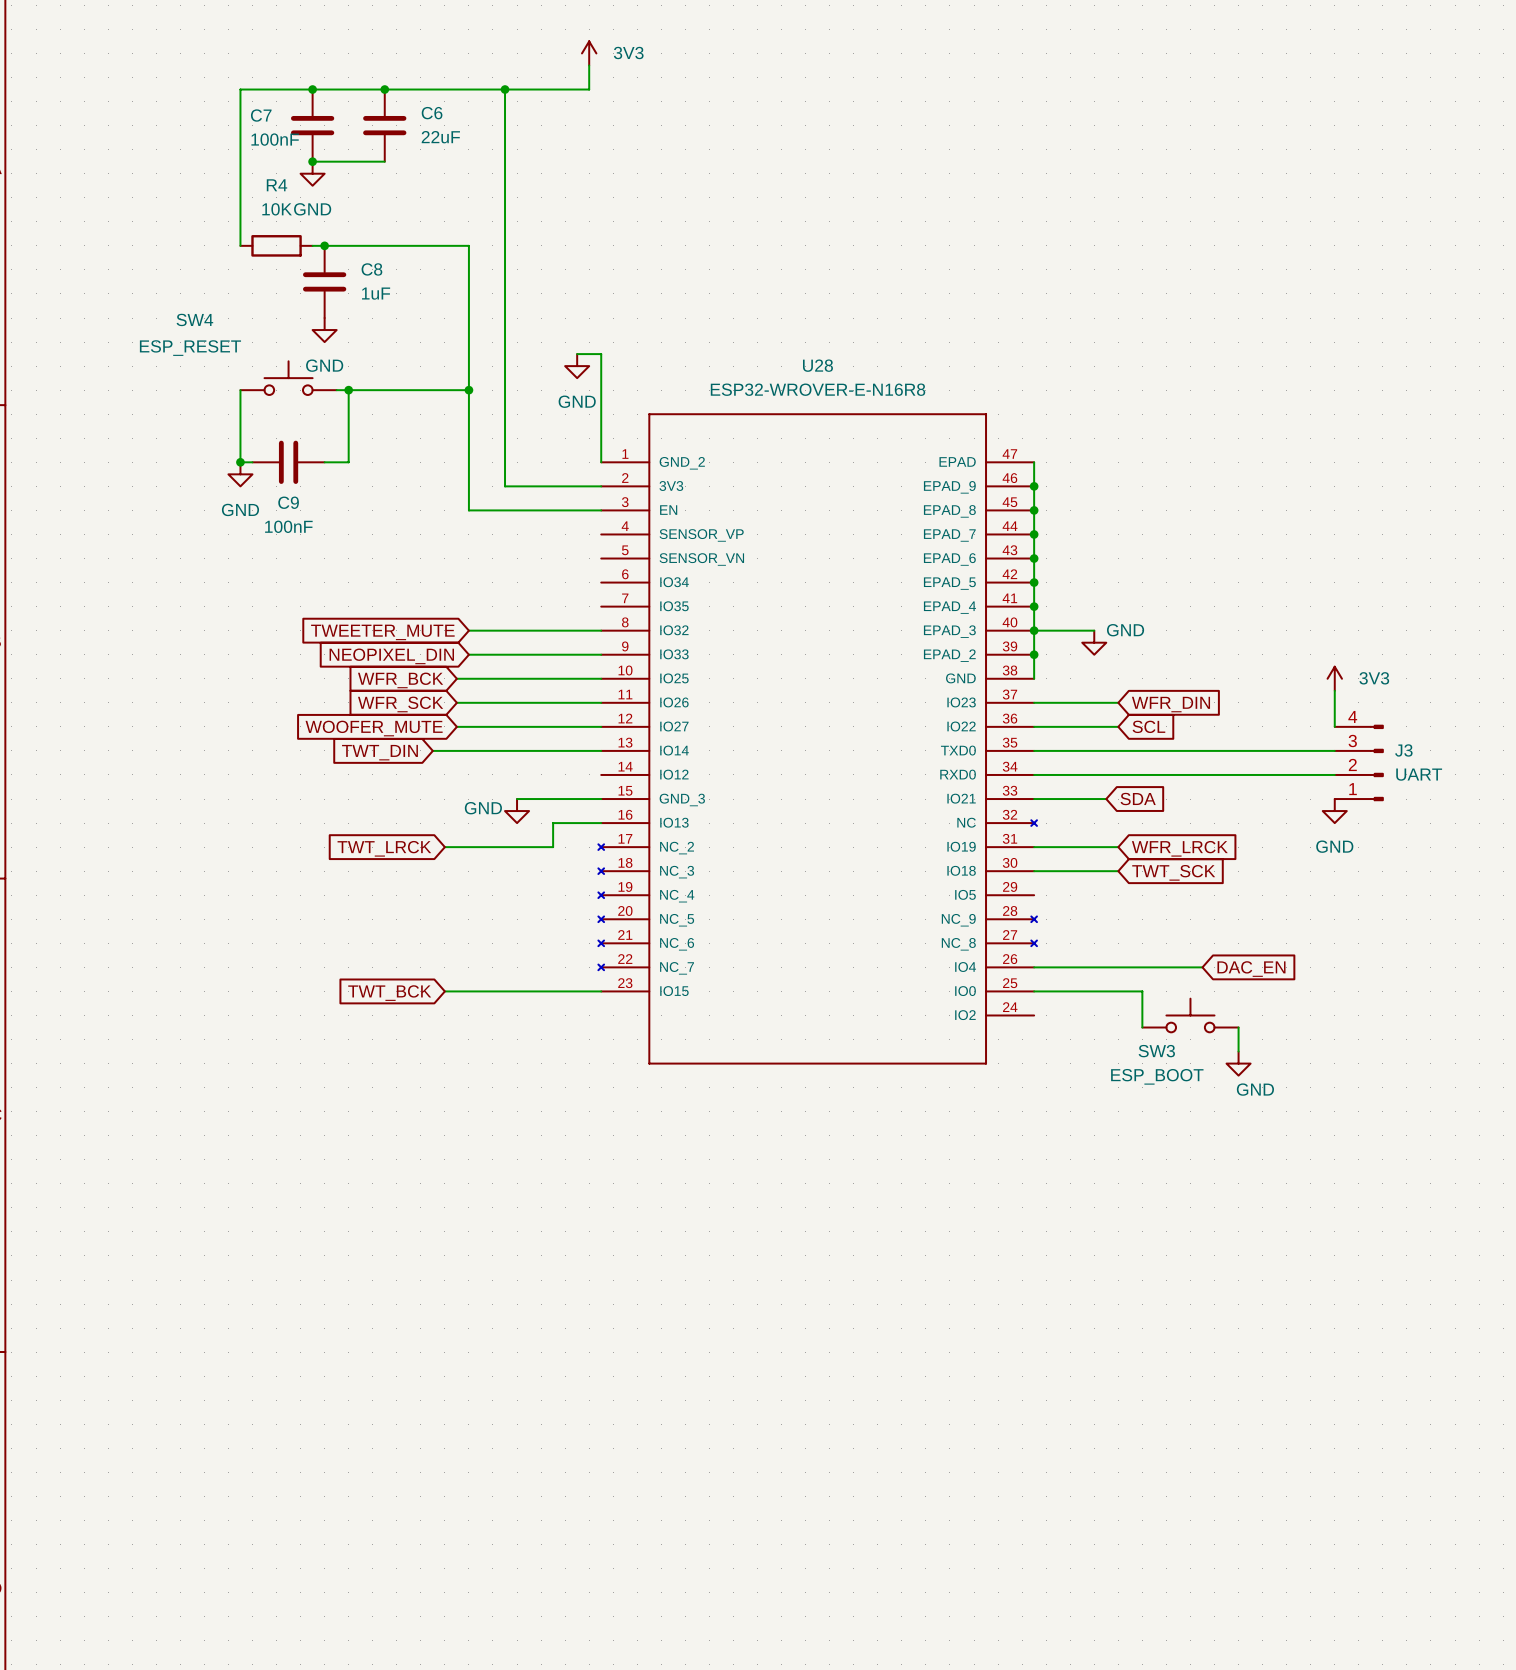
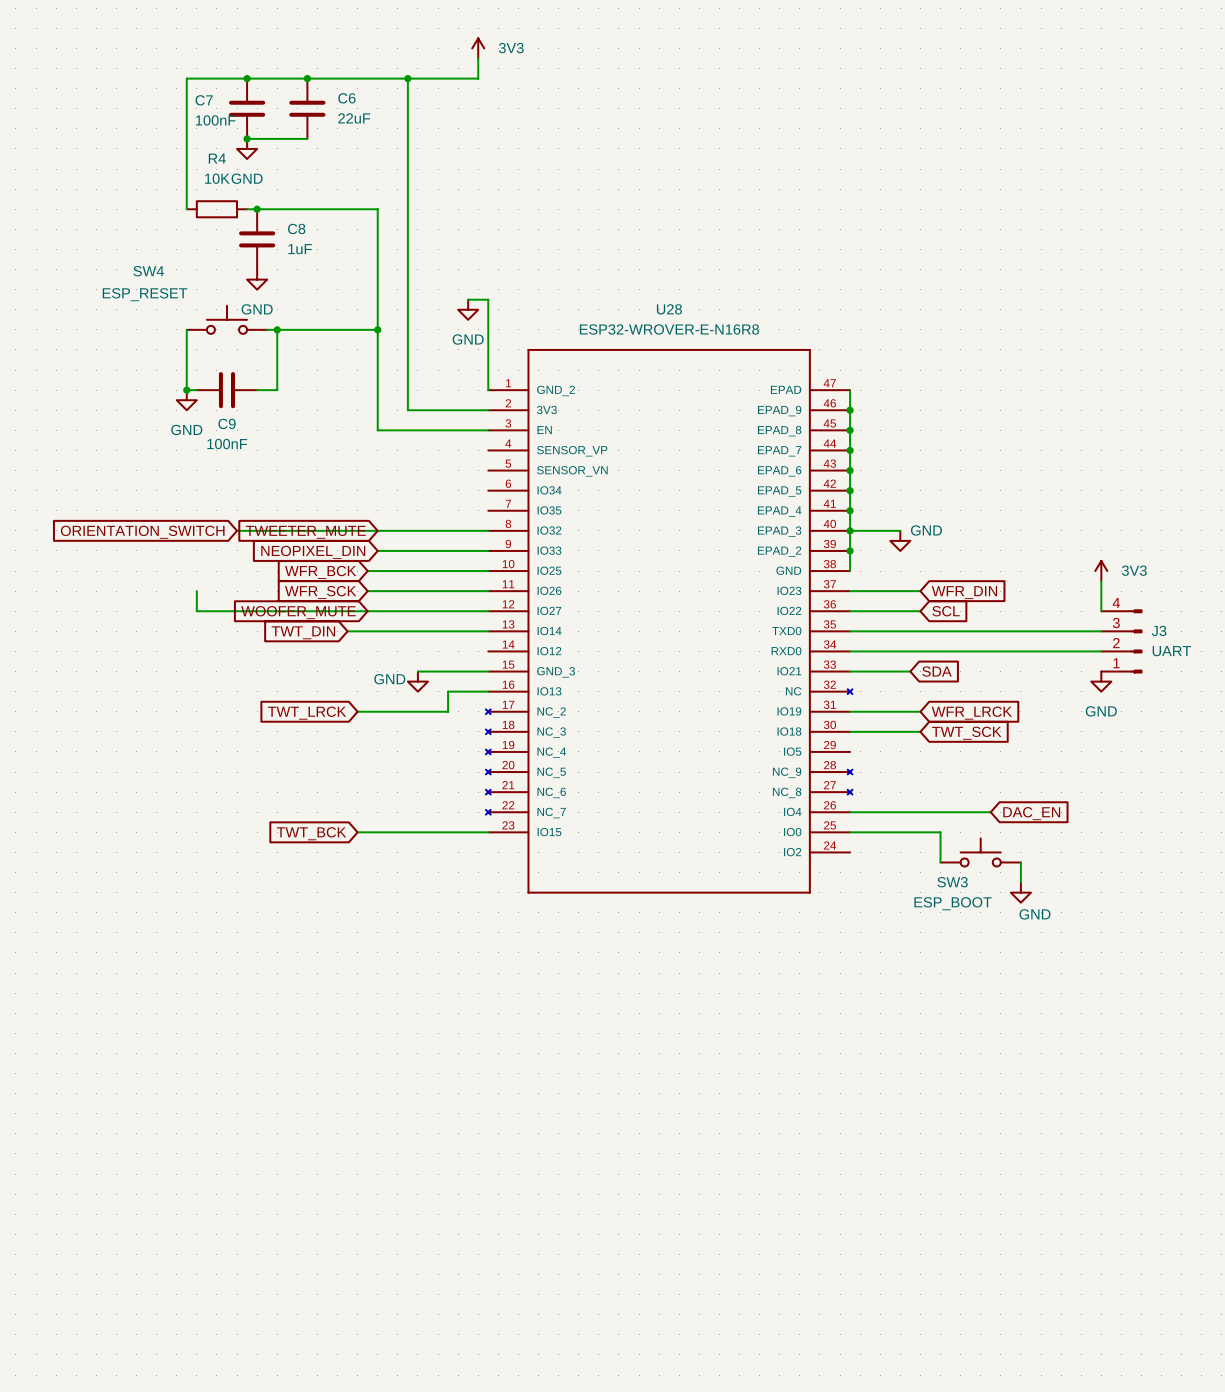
wire: none -> (237, 530) (377, 530)
global label: none -> ORIENTATION_SWITCH (142, 532)
wire: none -> (196, 591) (196, 611) (367, 611)

